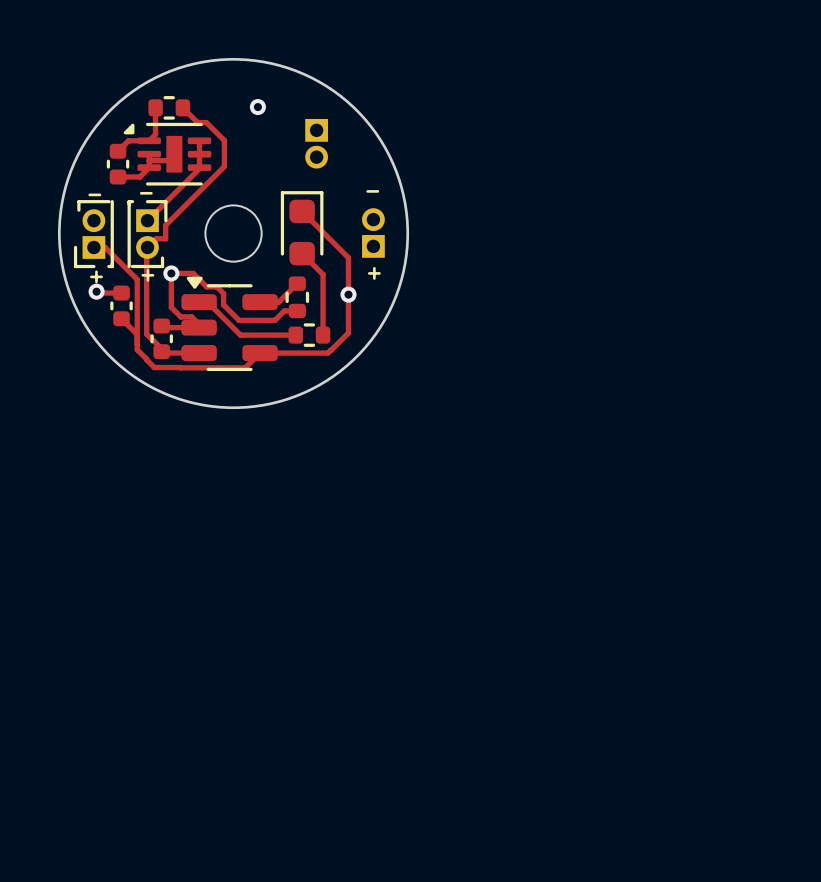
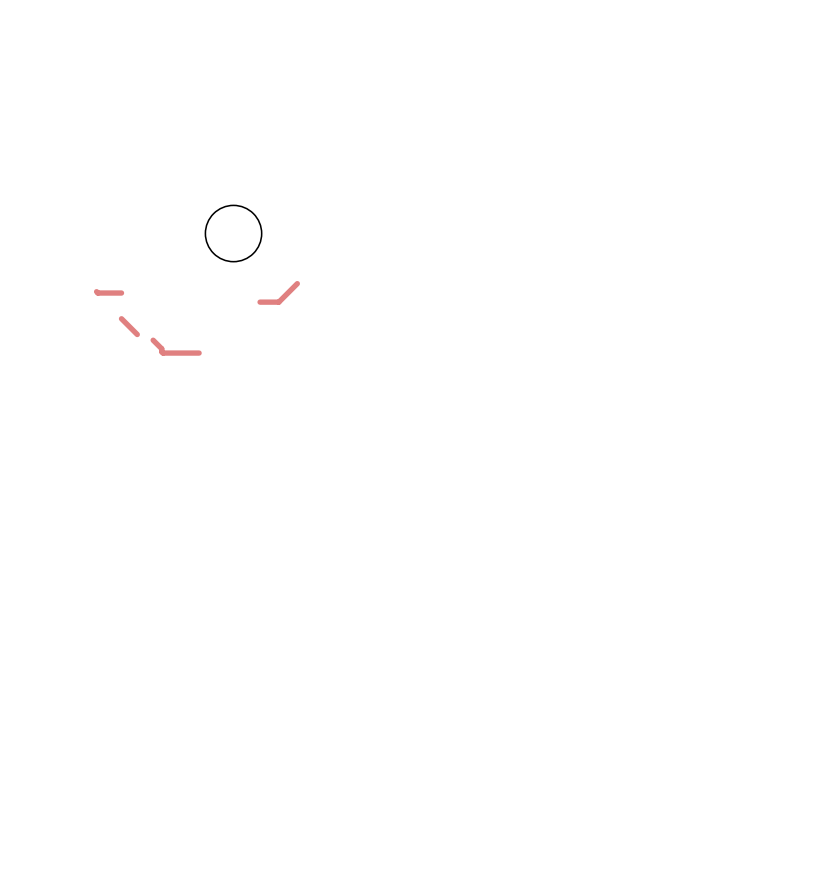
round board edge: [58, 58, 410, 410] -> none
track: (155, 107) (155, 134) (149, 140) (128, 140) (118, 151) -> none
part: (169, 107) -> none
track: (182, 107) (197, 122) (206, 122) (224, 140) (224, 166) (165, 225) (165, 238) (156, 238) (146, 248) (146, 334) (152, 340) -> none
via: (257, 107) -> none
track: (199, 140) (199, 168) (147, 220) -> none
part: (316, 143) -> none
track: (149, 154) (149, 167) (139, 176) (118, 176) -> none
part: (167, 154) -> none
track: (174, 154) (167, 160) (149, 160) -> none
part: (118, 164) -> none
text: - (372, 191) -> none
text: - (146, 193) -> none
text: - (94, 194) -> none
track: (302, 211) (348, 257) (348, 332) (331, 350) -> none
part: (302, 228) -> none
part: (373, 233) -> none
part: (93, 234) -> none
part: (147, 234) -> none
track: (93, 247) (105, 247) (137, 279) (137, 349) (154, 367) (180, 367) -> none
track: (302, 253) (323, 274) (323, 335) -> none
via: (171, 273) -> none
text: + (374, 273) -> none
text: + (147, 275) -> none
text: + (96, 276) -> none
via: (96, 291) -> none
via: (348, 294) -> none
part: (297, 297) -> none
track: (199, 302) (207, 302) (240, 335) (295, 335) -> none
part: (121, 305) -> none
track: (297, 310) (284, 310) (274, 320) (239, 320) (223, 304) (223, 293) (216, 286) (206, 286) (193, 273) (171, 273) (171, 307) (180, 316) (191, 316) (199, 324) (199, 327) (163, 327) (161, 325) -> none
part: (229, 323) -> none
part: (309, 335) -> none
part: (161, 338) -> none
track: (330, 350) (327, 353) (260, 353) -> none
track: (260, 353) (245, 367) (180, 367) -> none

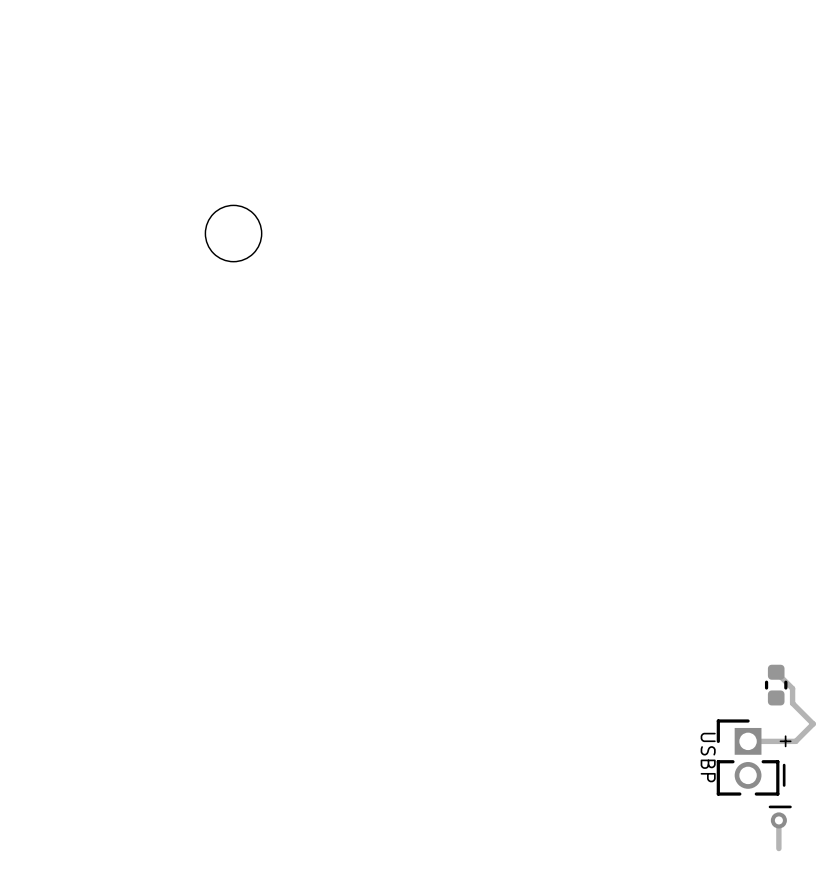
track: (297, 283) (278, 302) (260, 302) -> none
track: (96, 291) (121, 293) -> none
track: (121, 318) (137, 334) -> none
track: (153, 340) (161, 348) (163, 353) (199, 353) -> none
track: none -> (776, 673) (792, 688) (792, 703) (813, 723) (795, 741) (748, 741)
part: none -> (776, 685)
text: none -> + (785, 741)
text: none -> USBP (708, 757)
part: none -> (748, 757)
text: none -> - (784, 775)
text: none -> - (780, 806)
track: none -> (778, 820) (778, 848)
via: none -> (778, 820)

